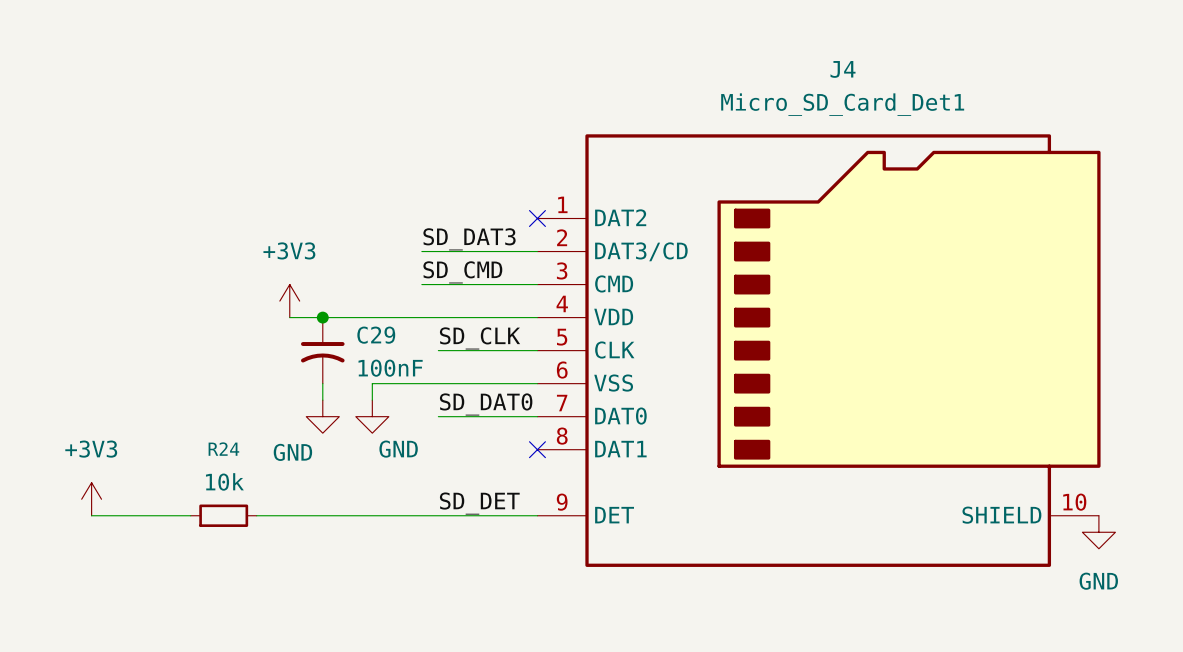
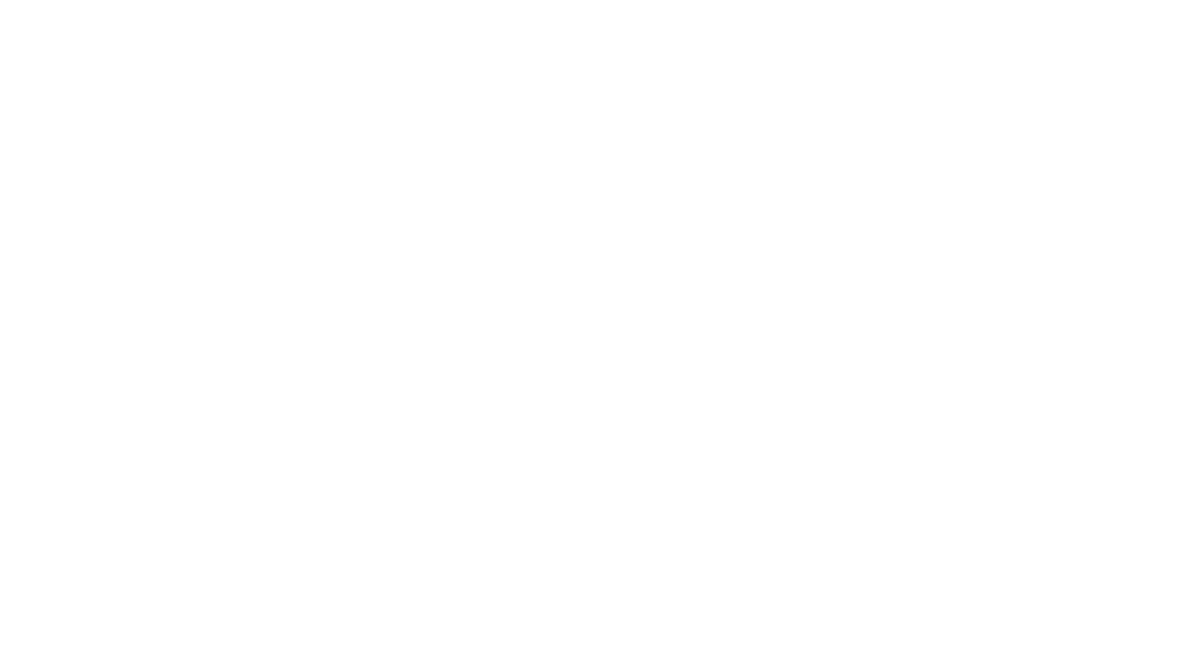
no-connect mark: (537, 218) -> none
label: SD_DAT3 (469, 239) -> none
wire: (421, 251) (537, 251) -> none
label: SD_CMD (462, 272) -> none
wire: (421, 284) (537, 284) -> none
power symbol: +3V3 (289, 301) -> none
wire: (289, 317) (537, 317) -> none
junction: (322, 317) -> none
label: SD_CLK (480, 338) -> none
C29: 100nF (322, 350) -> none
wire: (438, 350) (537, 350) -> none
J4: Micro_SD_Card_Det1 (819, 350) -> none
wire: (322, 383) (322, 400) -> none
wire: (537, 383) (372, 383) (372, 400) -> none
label: SD_DAT0 (486, 404) -> none
power symbol: GND (322, 416) -> none
power symbol: GND (372, 416) -> none
wire: (438, 416) (537, 416) -> none
no-connect mark: (537, 449) -> none
power symbol: +3V3 (91, 499) -> none
label: SD_DET (479, 503) -> none
wire: (91, 515) (190, 515) -> none
R24: 10k (223, 515) -> none
wire: (256, 515) (537, 515) -> none
power symbol: GND (1098, 532) -> none

